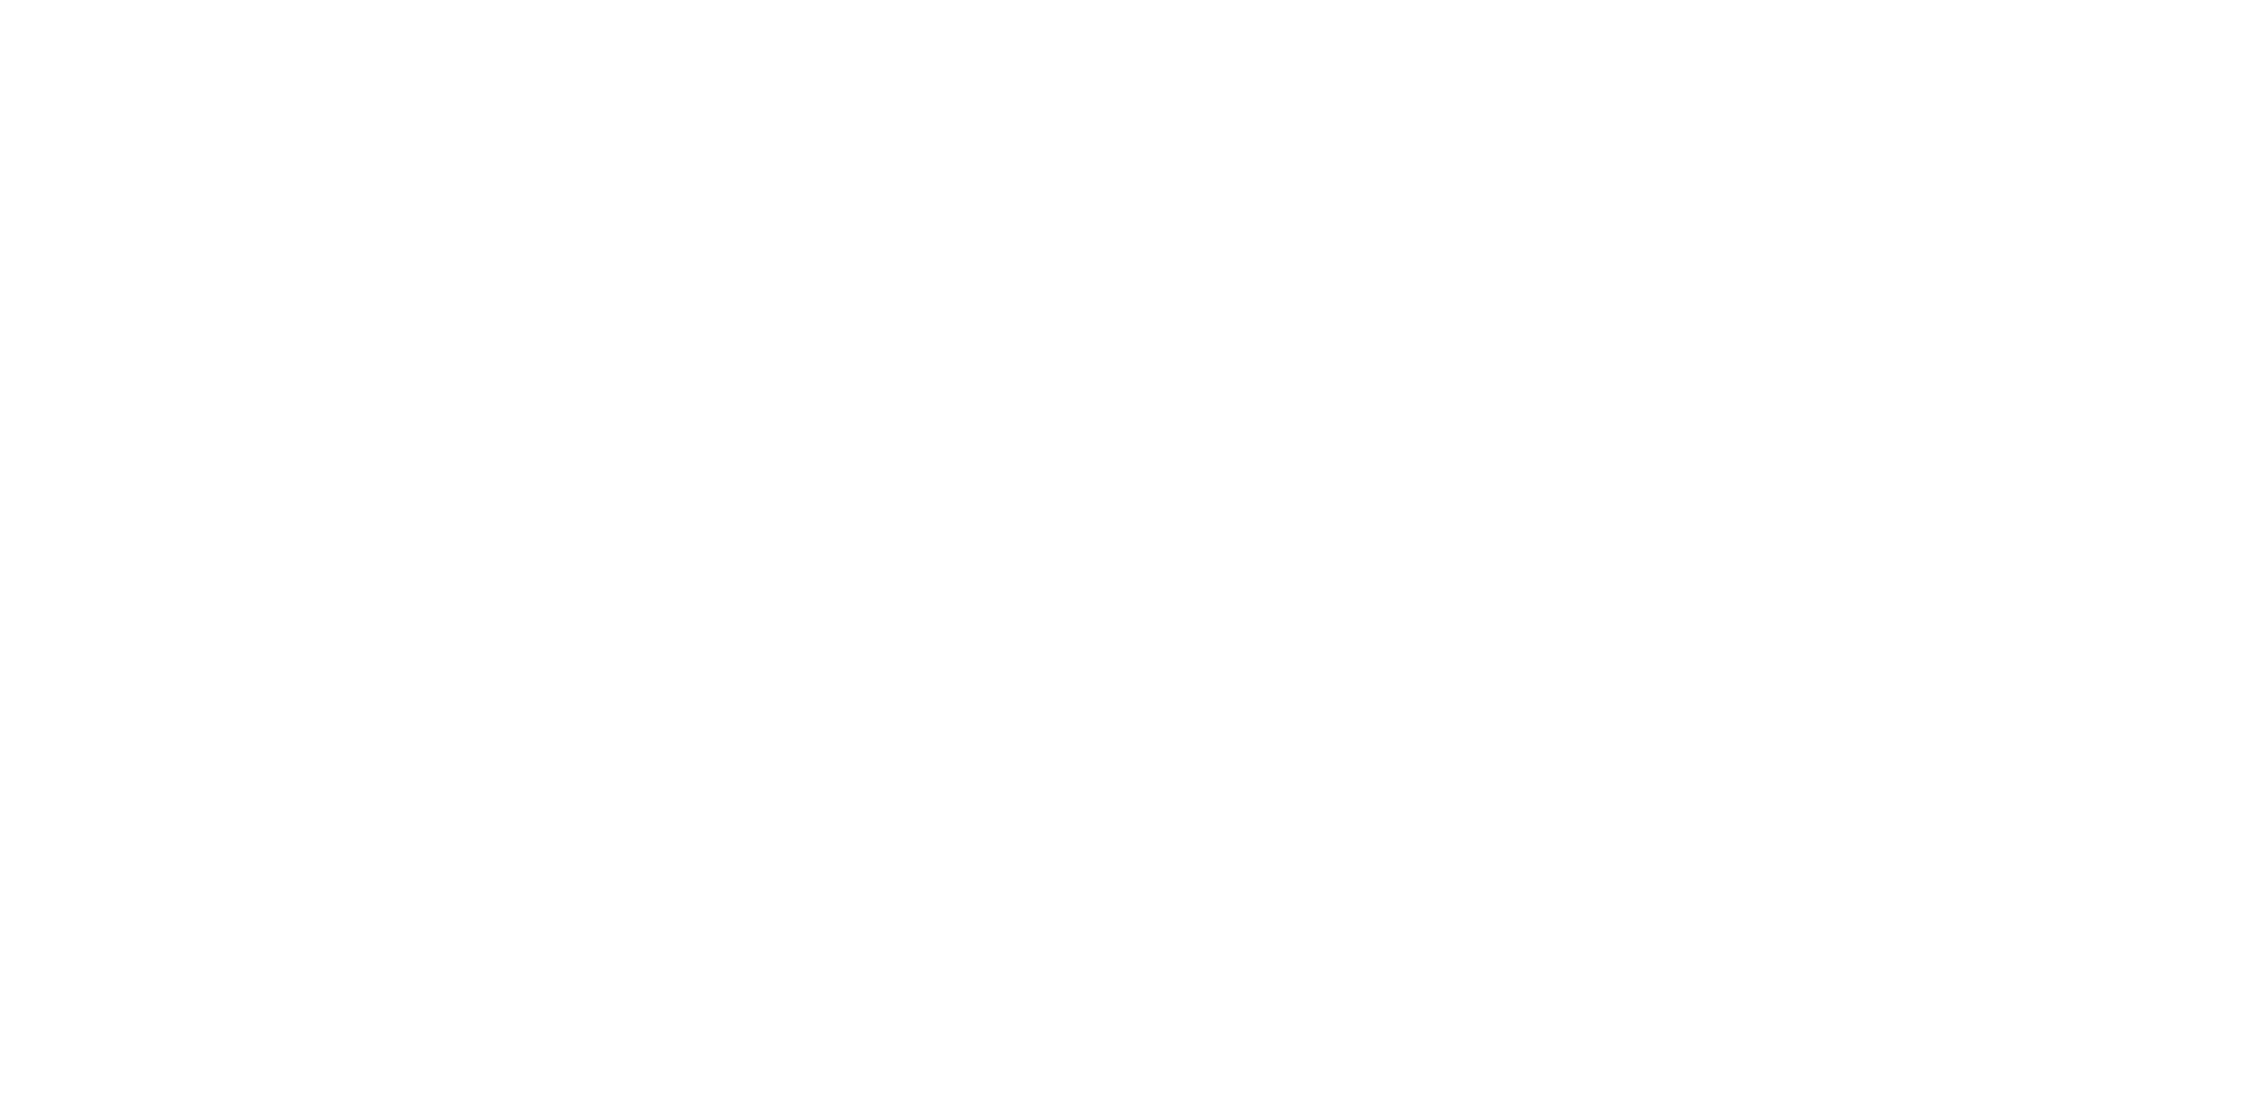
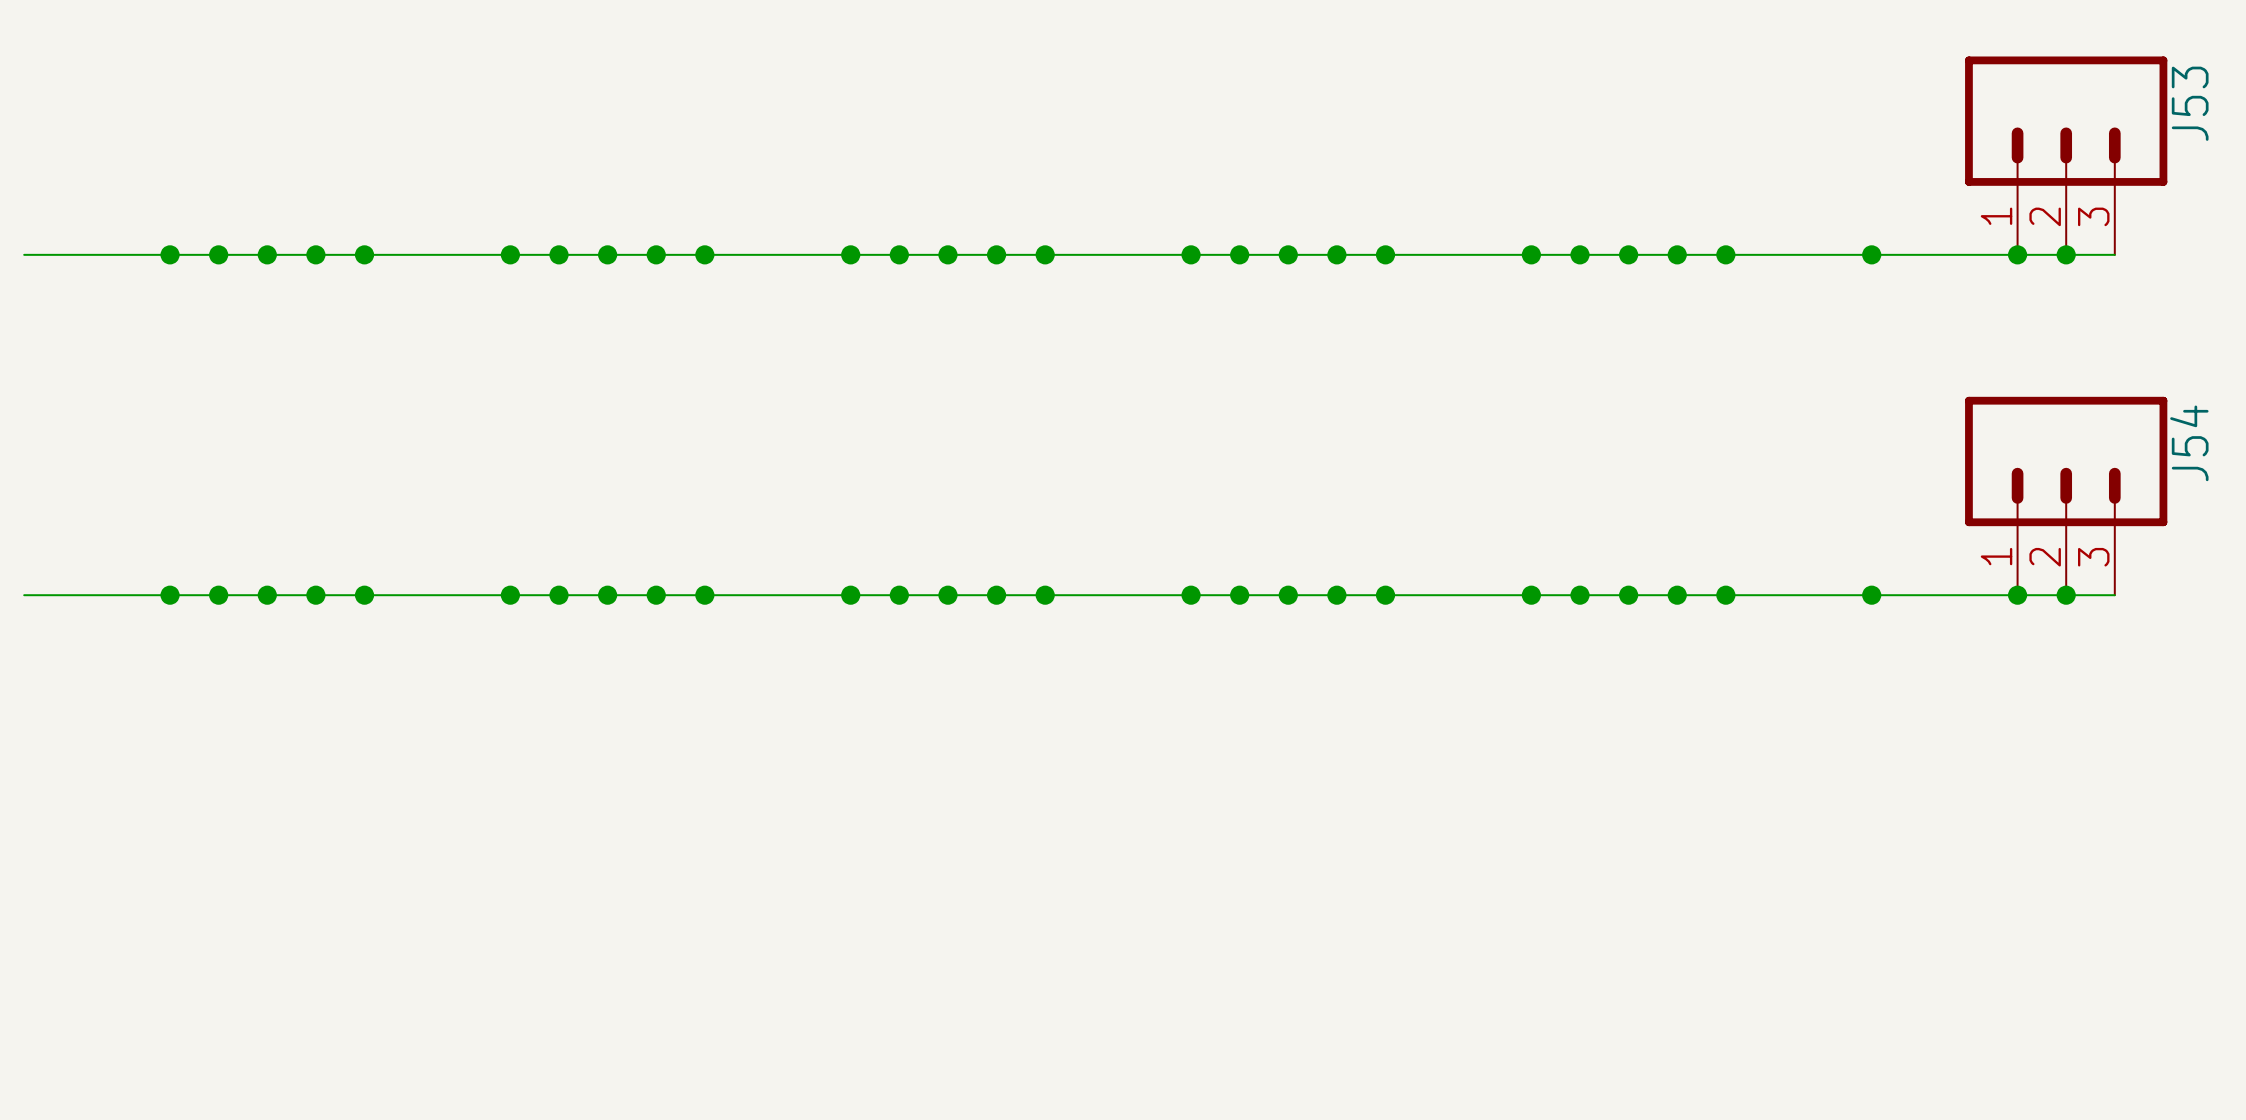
J53: none -> (2066, 155)
wire: none -> (24, 254) (2114, 254)
junction: none -> (170, 254)
junction: none -> (218, 254)
junction: none -> (267, 254)
junction: none -> (315, 254)
junction: none -> (364, 254)
junction: none -> (510, 254)
junction: none -> (559, 254)
junction: none -> (607, 254)
junction: none -> (656, 254)
junction: none -> (704, 254)
junction: none -> (850, 254)
junction: none -> (899, 254)
junction: none -> (947, 254)
junction: none -> (996, 254)
junction: none -> (1045, 254)
junction: none -> (1191, 254)
junction: none -> (1239, 254)
junction: none -> (1288, 254)
junction: none -> (1336, 254)
junction: none -> (1385, 254)
junction: none -> (1531, 254)
junction: none -> (1580, 254)
junction: none -> (1628, 254)
junction: none -> (1677, 254)
junction: none -> (1725, 254)
junction: none -> (1871, 254)
junction: none -> (2017, 254)
junction: none -> (2066, 254)
J54: none -> (2066, 496)
wire: none -> (24, 595) (2114, 595)
junction: none -> (170, 595)
junction: none -> (218, 595)
junction: none -> (267, 595)
junction: none -> (315, 595)
junction: none -> (364, 595)
junction: none -> (510, 595)
junction: none -> (559, 595)
junction: none -> (607, 595)
junction: none -> (656, 595)
junction: none -> (704, 595)
junction: none -> (850, 595)
junction: none -> (899, 595)
junction: none -> (947, 595)
junction: none -> (996, 595)
junction: none -> (1045, 595)
junction: none -> (1191, 595)
junction: none -> (1239, 595)
junction: none -> (1288, 595)
junction: none -> (1336, 595)
junction: none -> (1385, 595)
junction: none -> (1531, 595)
junction: none -> (1580, 595)
junction: none -> (1628, 595)
junction: none -> (1677, 595)
junction: none -> (1725, 595)
junction: none -> (1871, 595)
junction: none -> (2017, 595)
junction: none -> (2066, 595)

